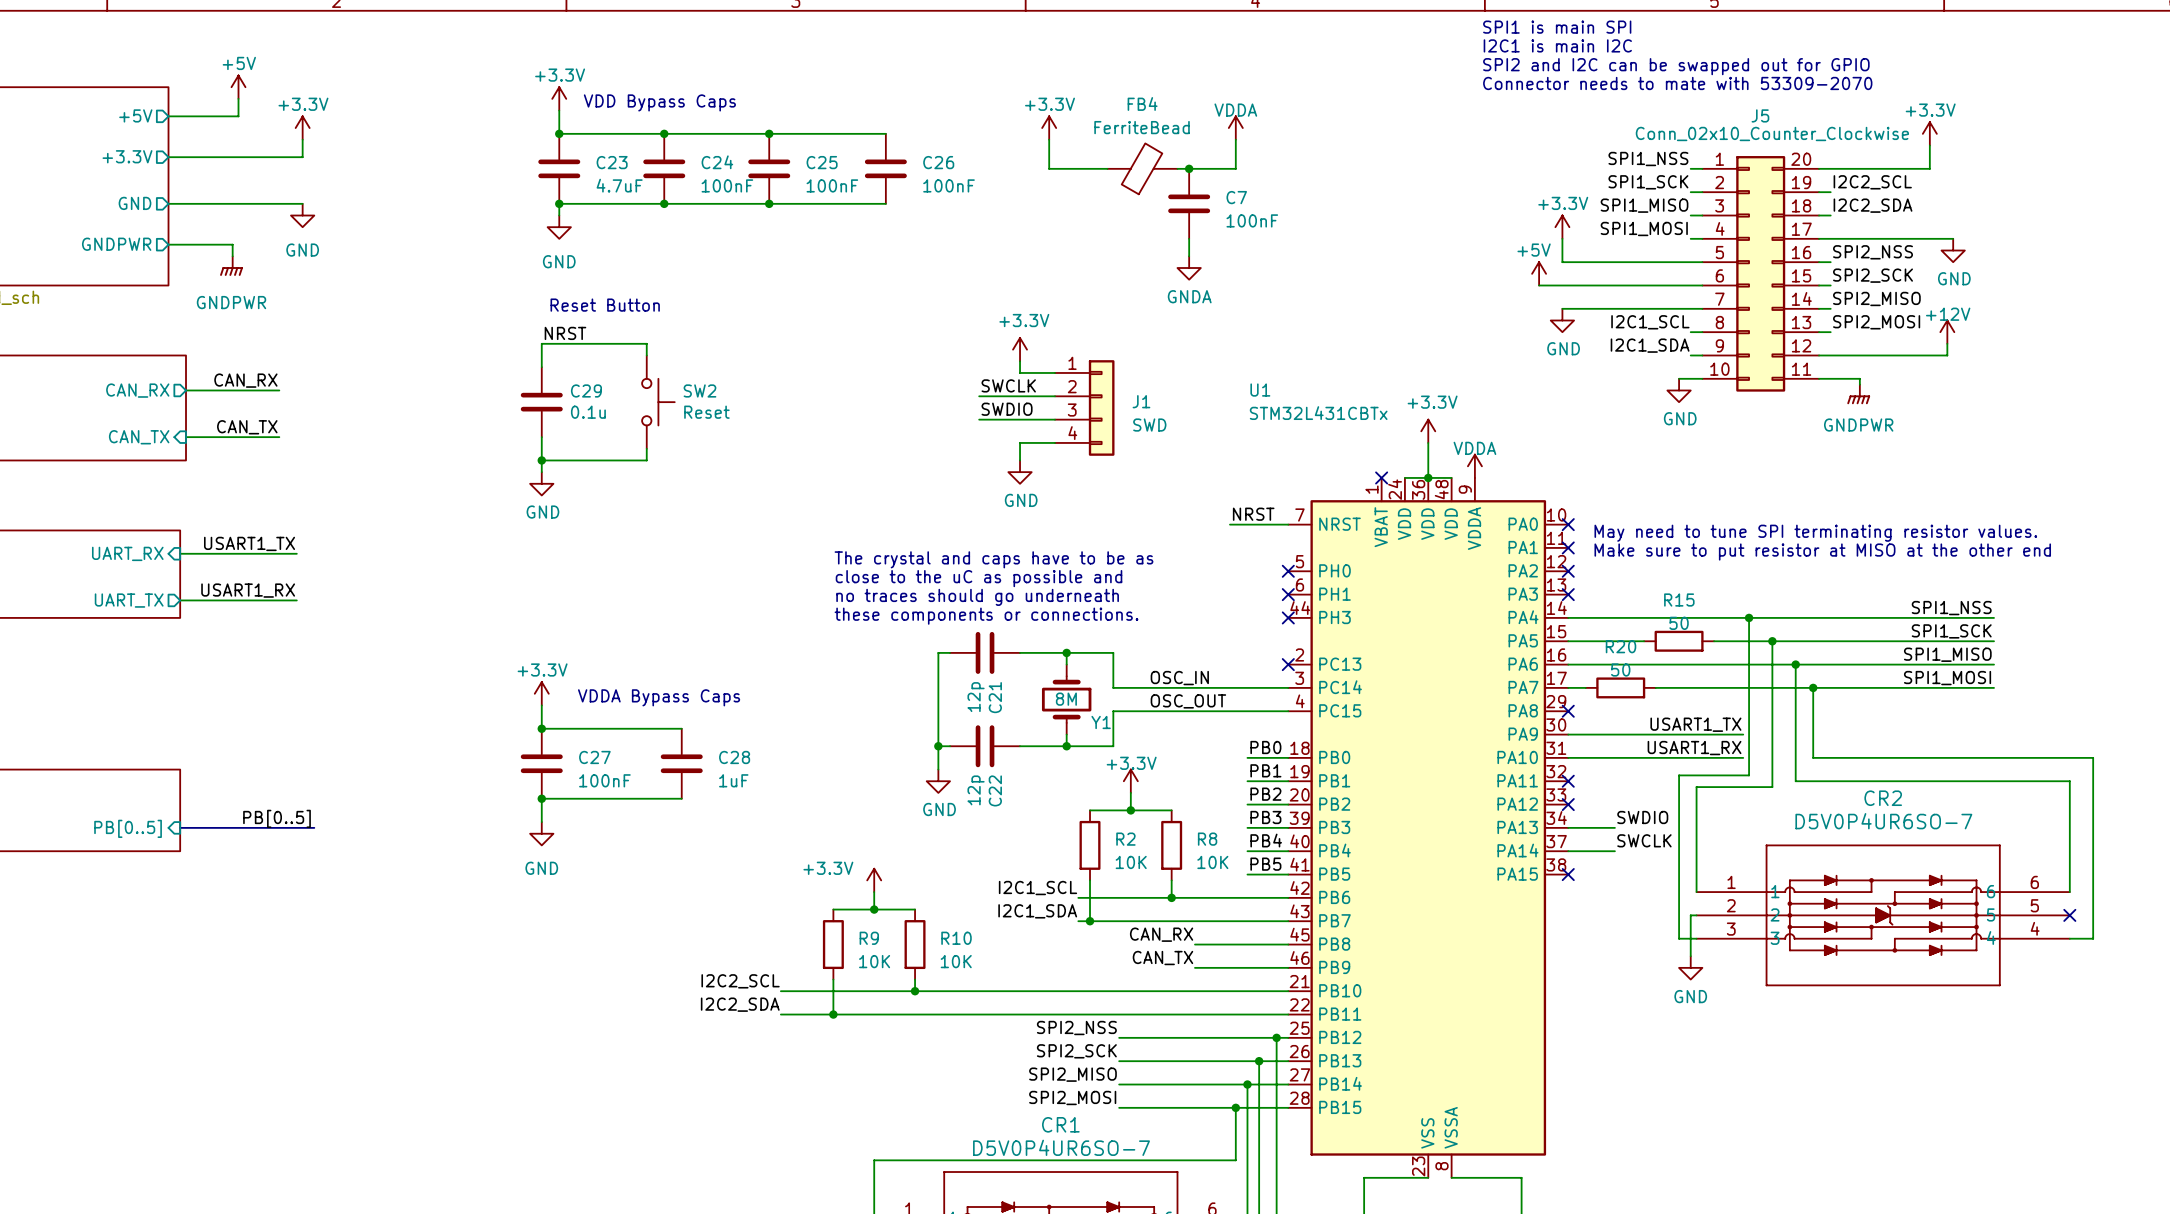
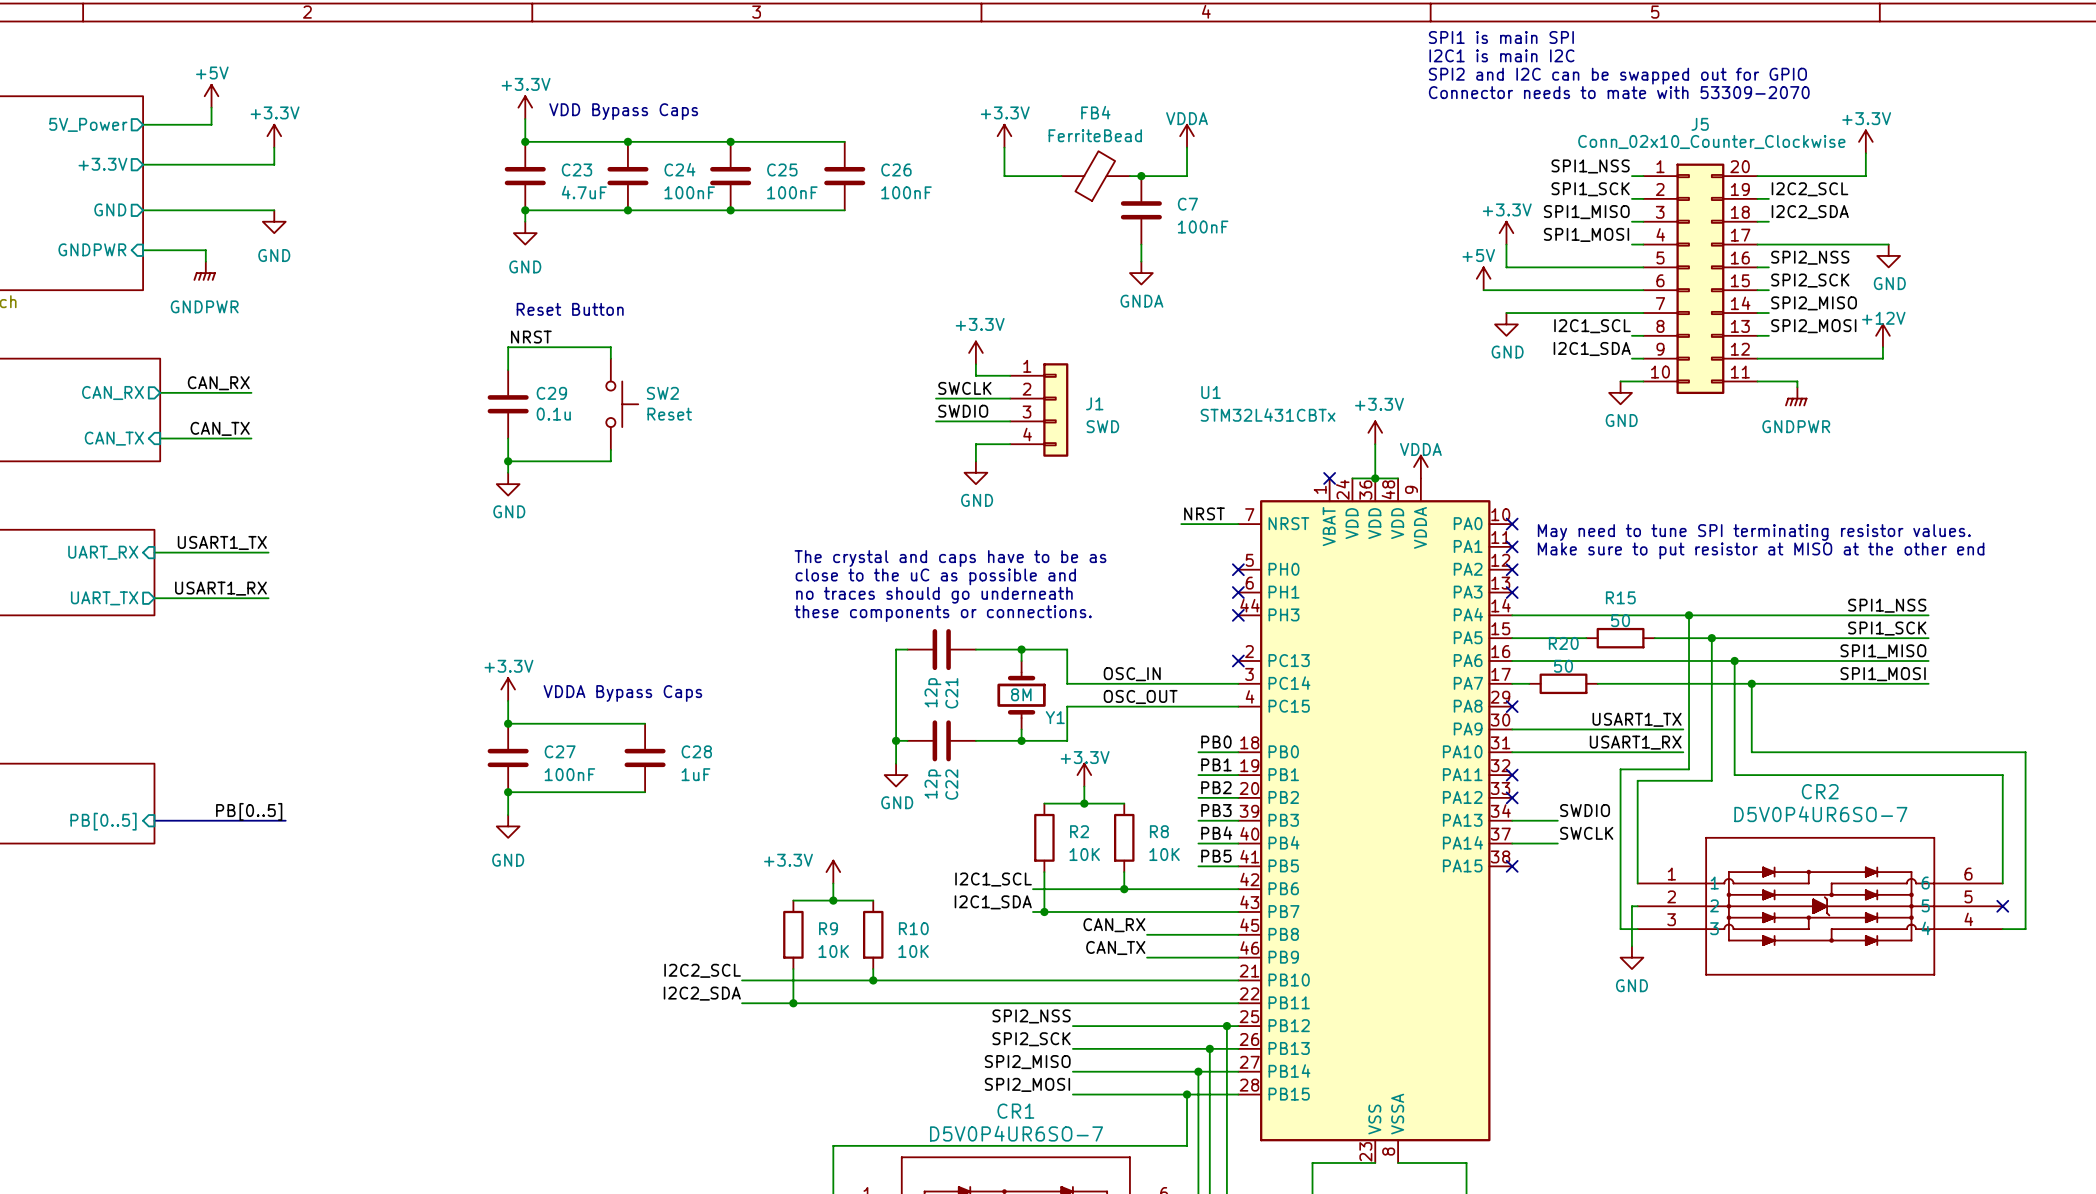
sheet pin: +5V (135, 115) -> 5V_Power (88, 124)
sheet pin shape: output (116, 244) -> input (92, 249)

